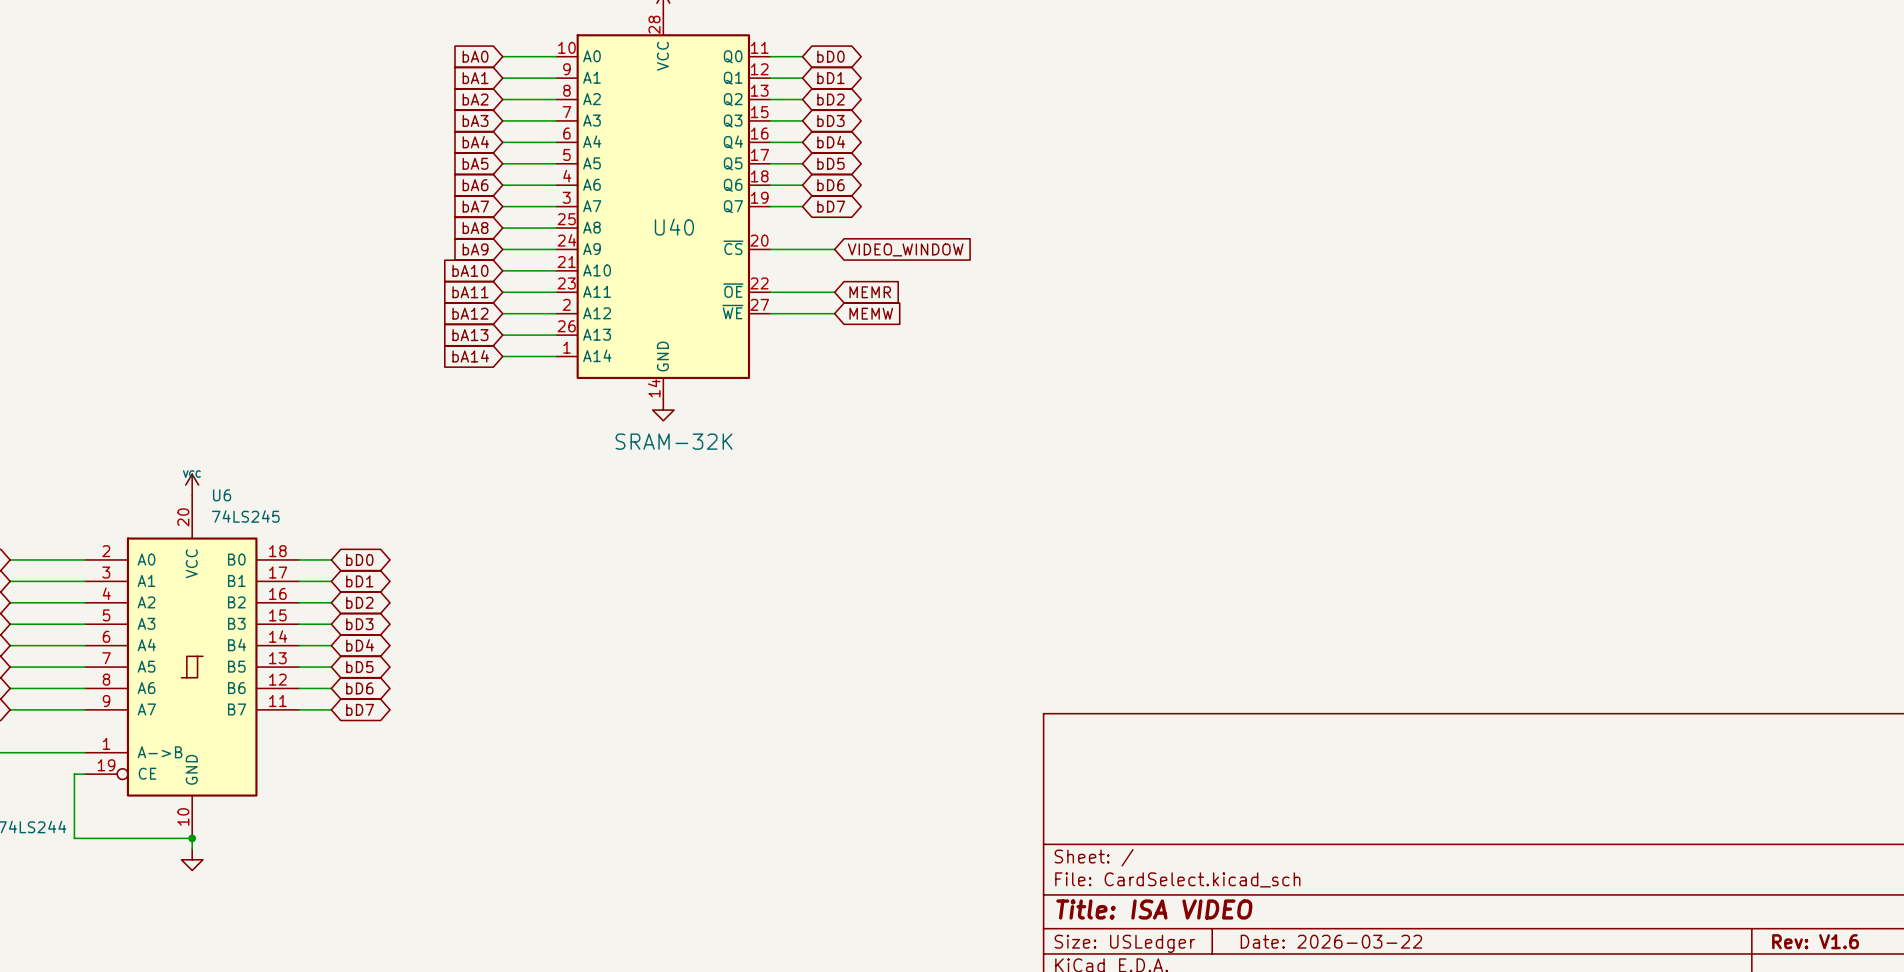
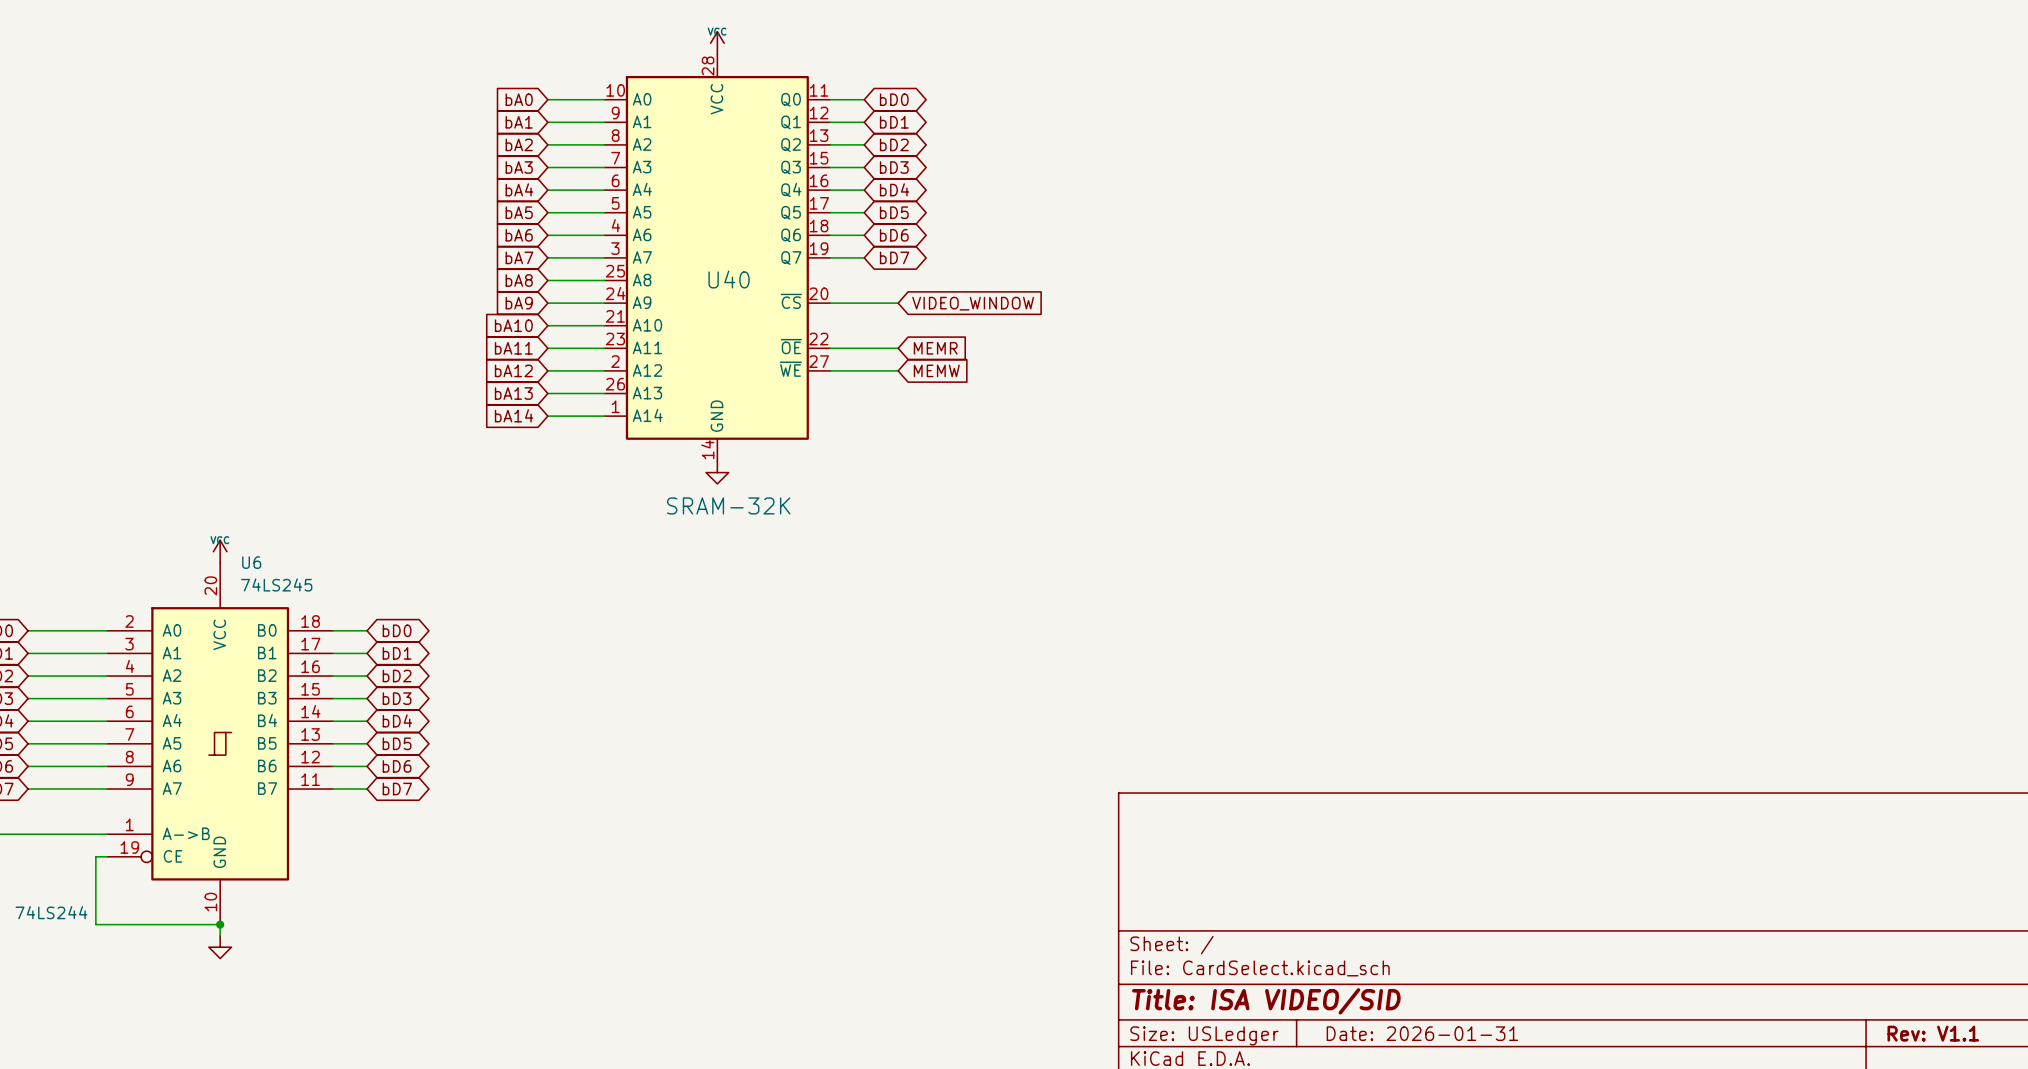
title block: Title: ISA VIDEO (1154, 909) -> Title: ISA VIDEO/SID (1266, 1001)
title block: Date: 2026-03-22 (1331, 941) -> Date: 2026-01-31 (1422, 1033)
title block: Rev: V1.6 (1815, 941) -> Rev: V1.1 (1933, 1033)

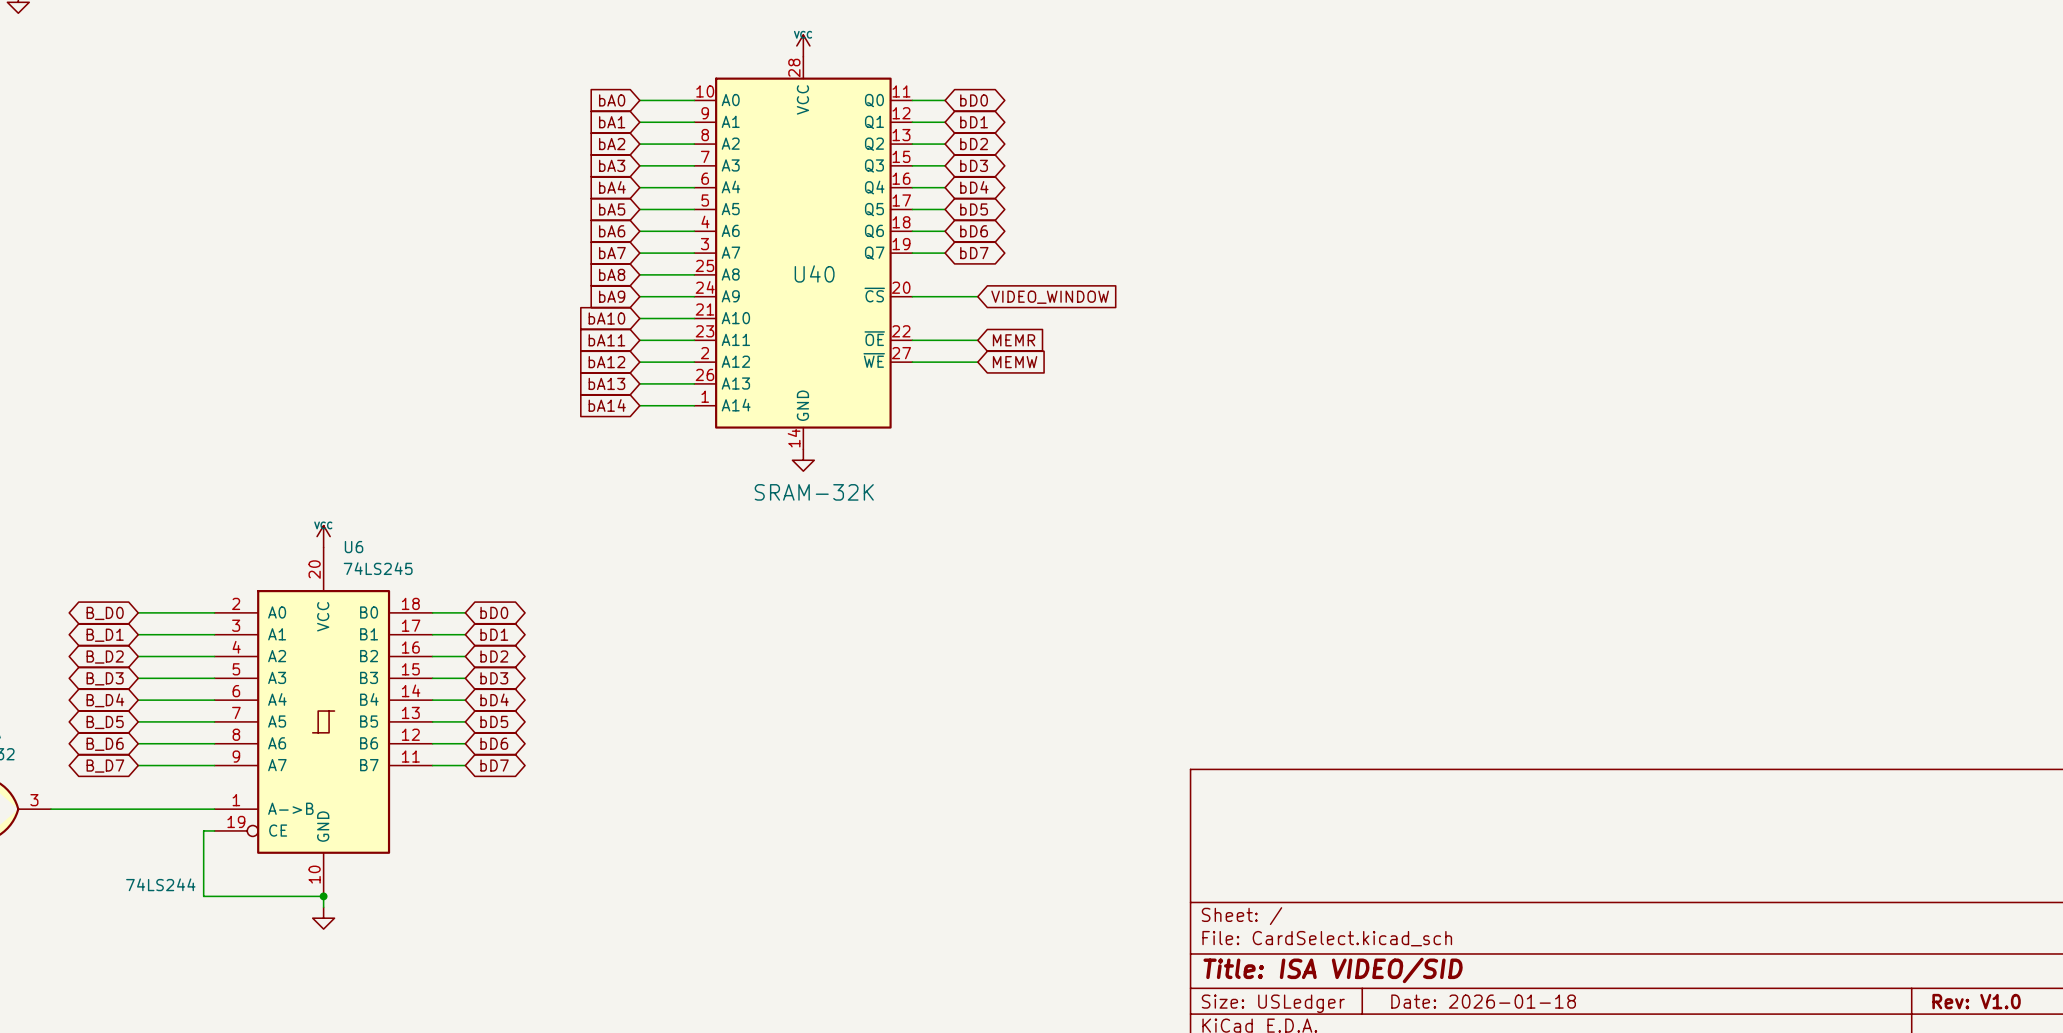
title block: Date: 2026-01-31 (1422, 1033) -> Date: 2026-01-18 (1483, 1001)
title block: Rev: V1.1 (1933, 1033) -> Rev: V1.0 (1976, 1001)

